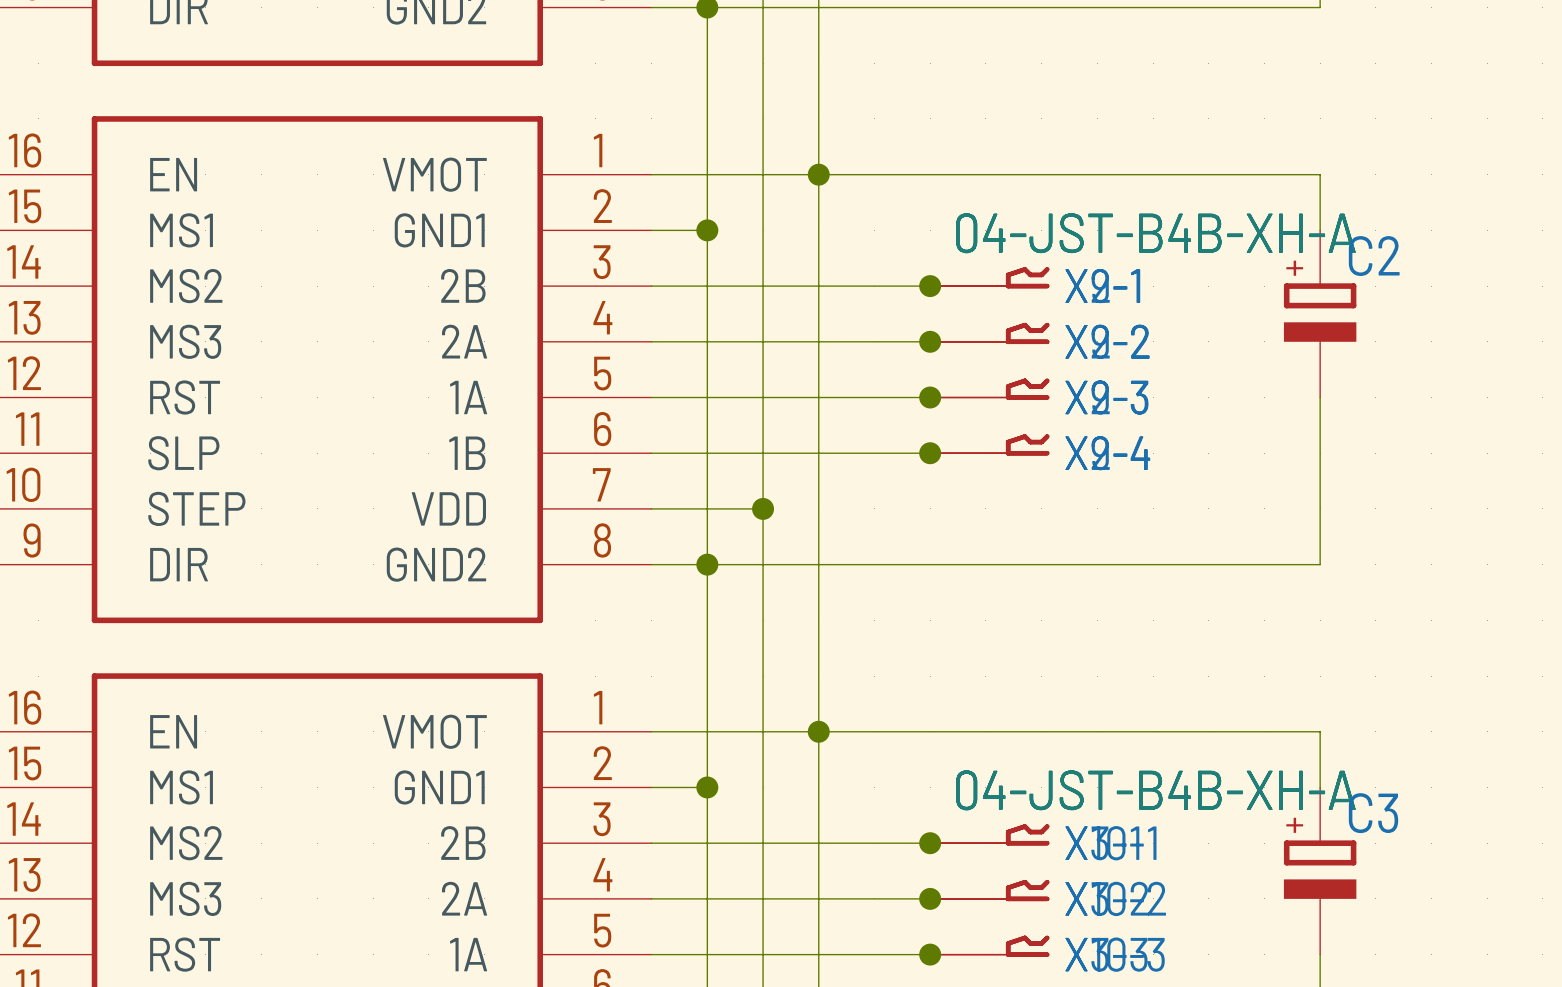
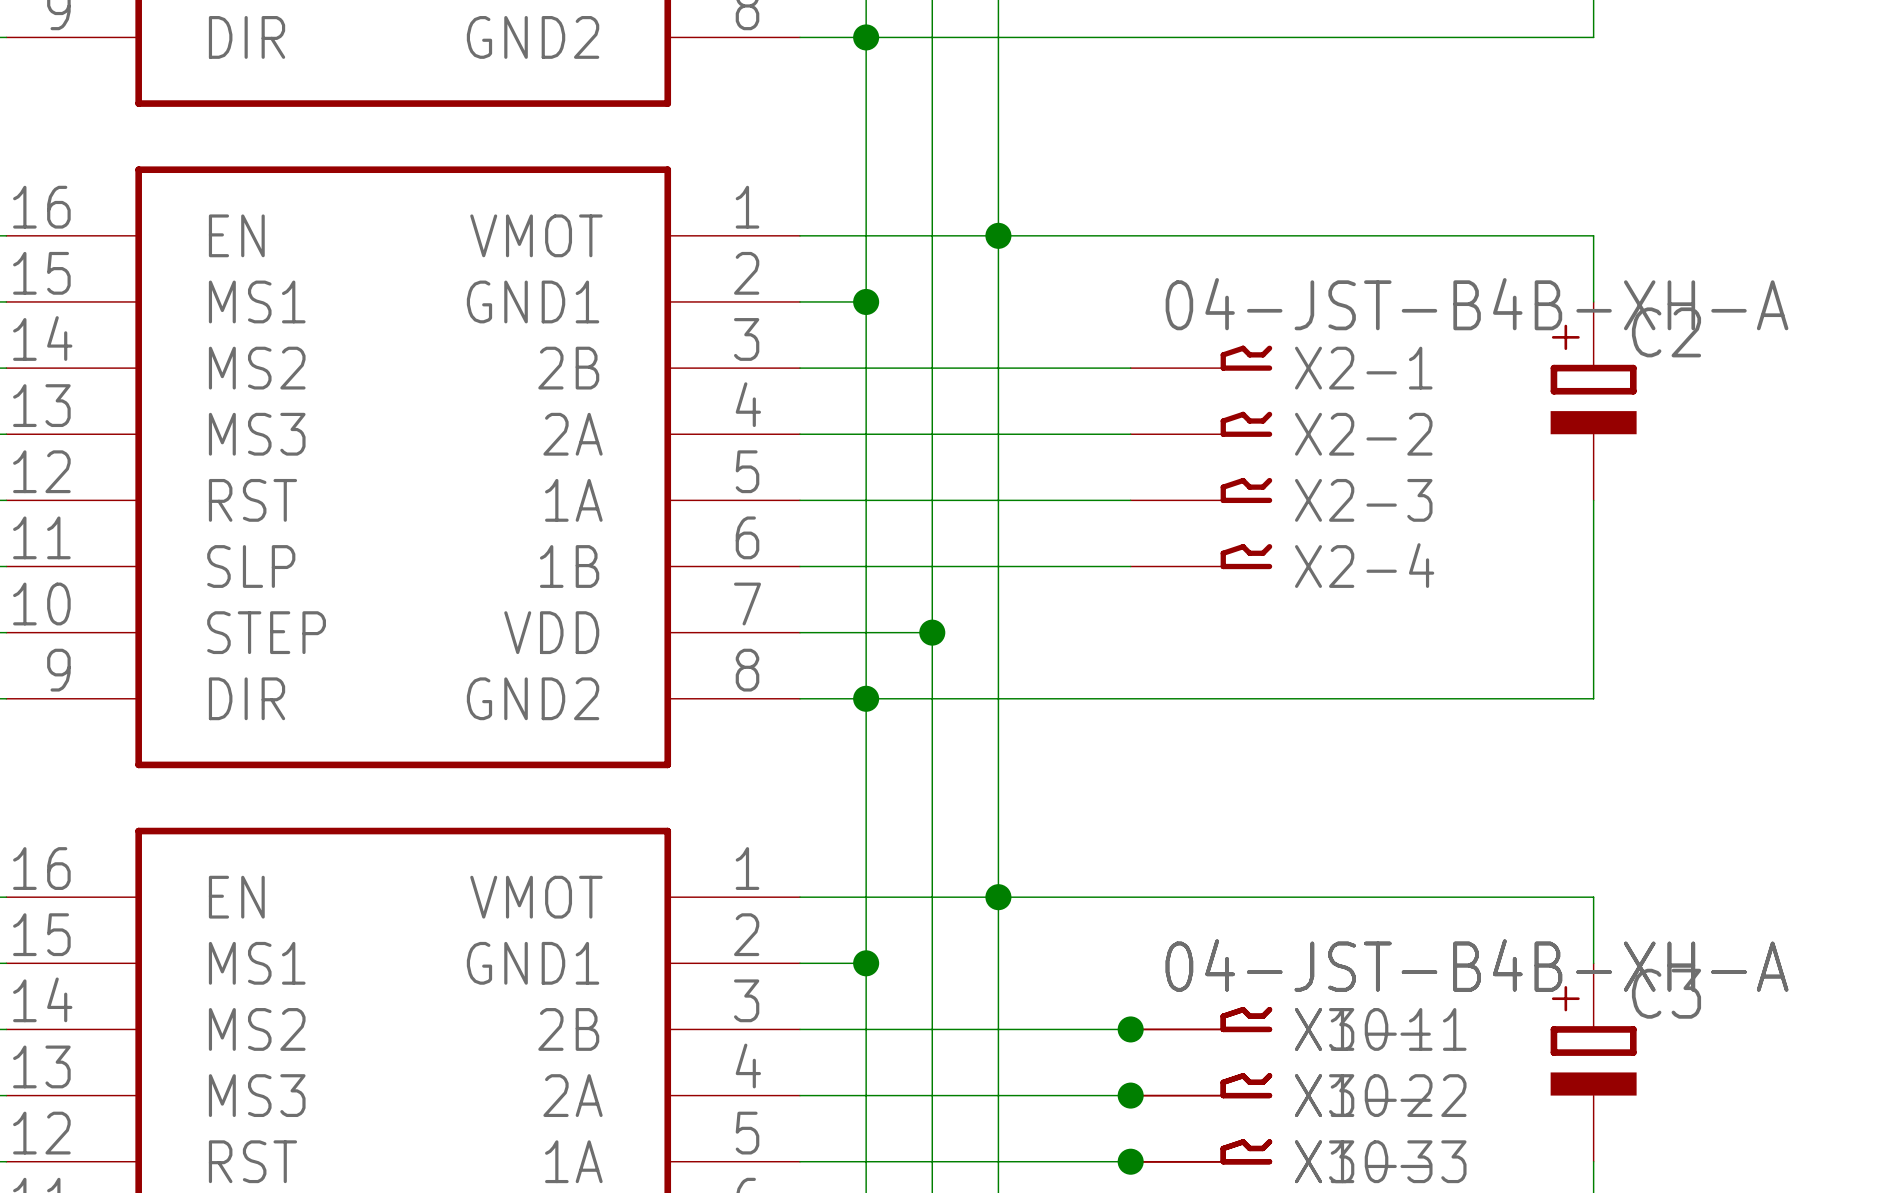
part: 04-JST-B4B-XH-A (989, 277) -> none
junction: (930, 286) -> none
part: (989, 333) -> none
junction: (930, 341) -> none
part: (989, 389) -> none
junction: (930, 397) -> none
part: (989, 444) -> none
junction: (930, 453) -> none

